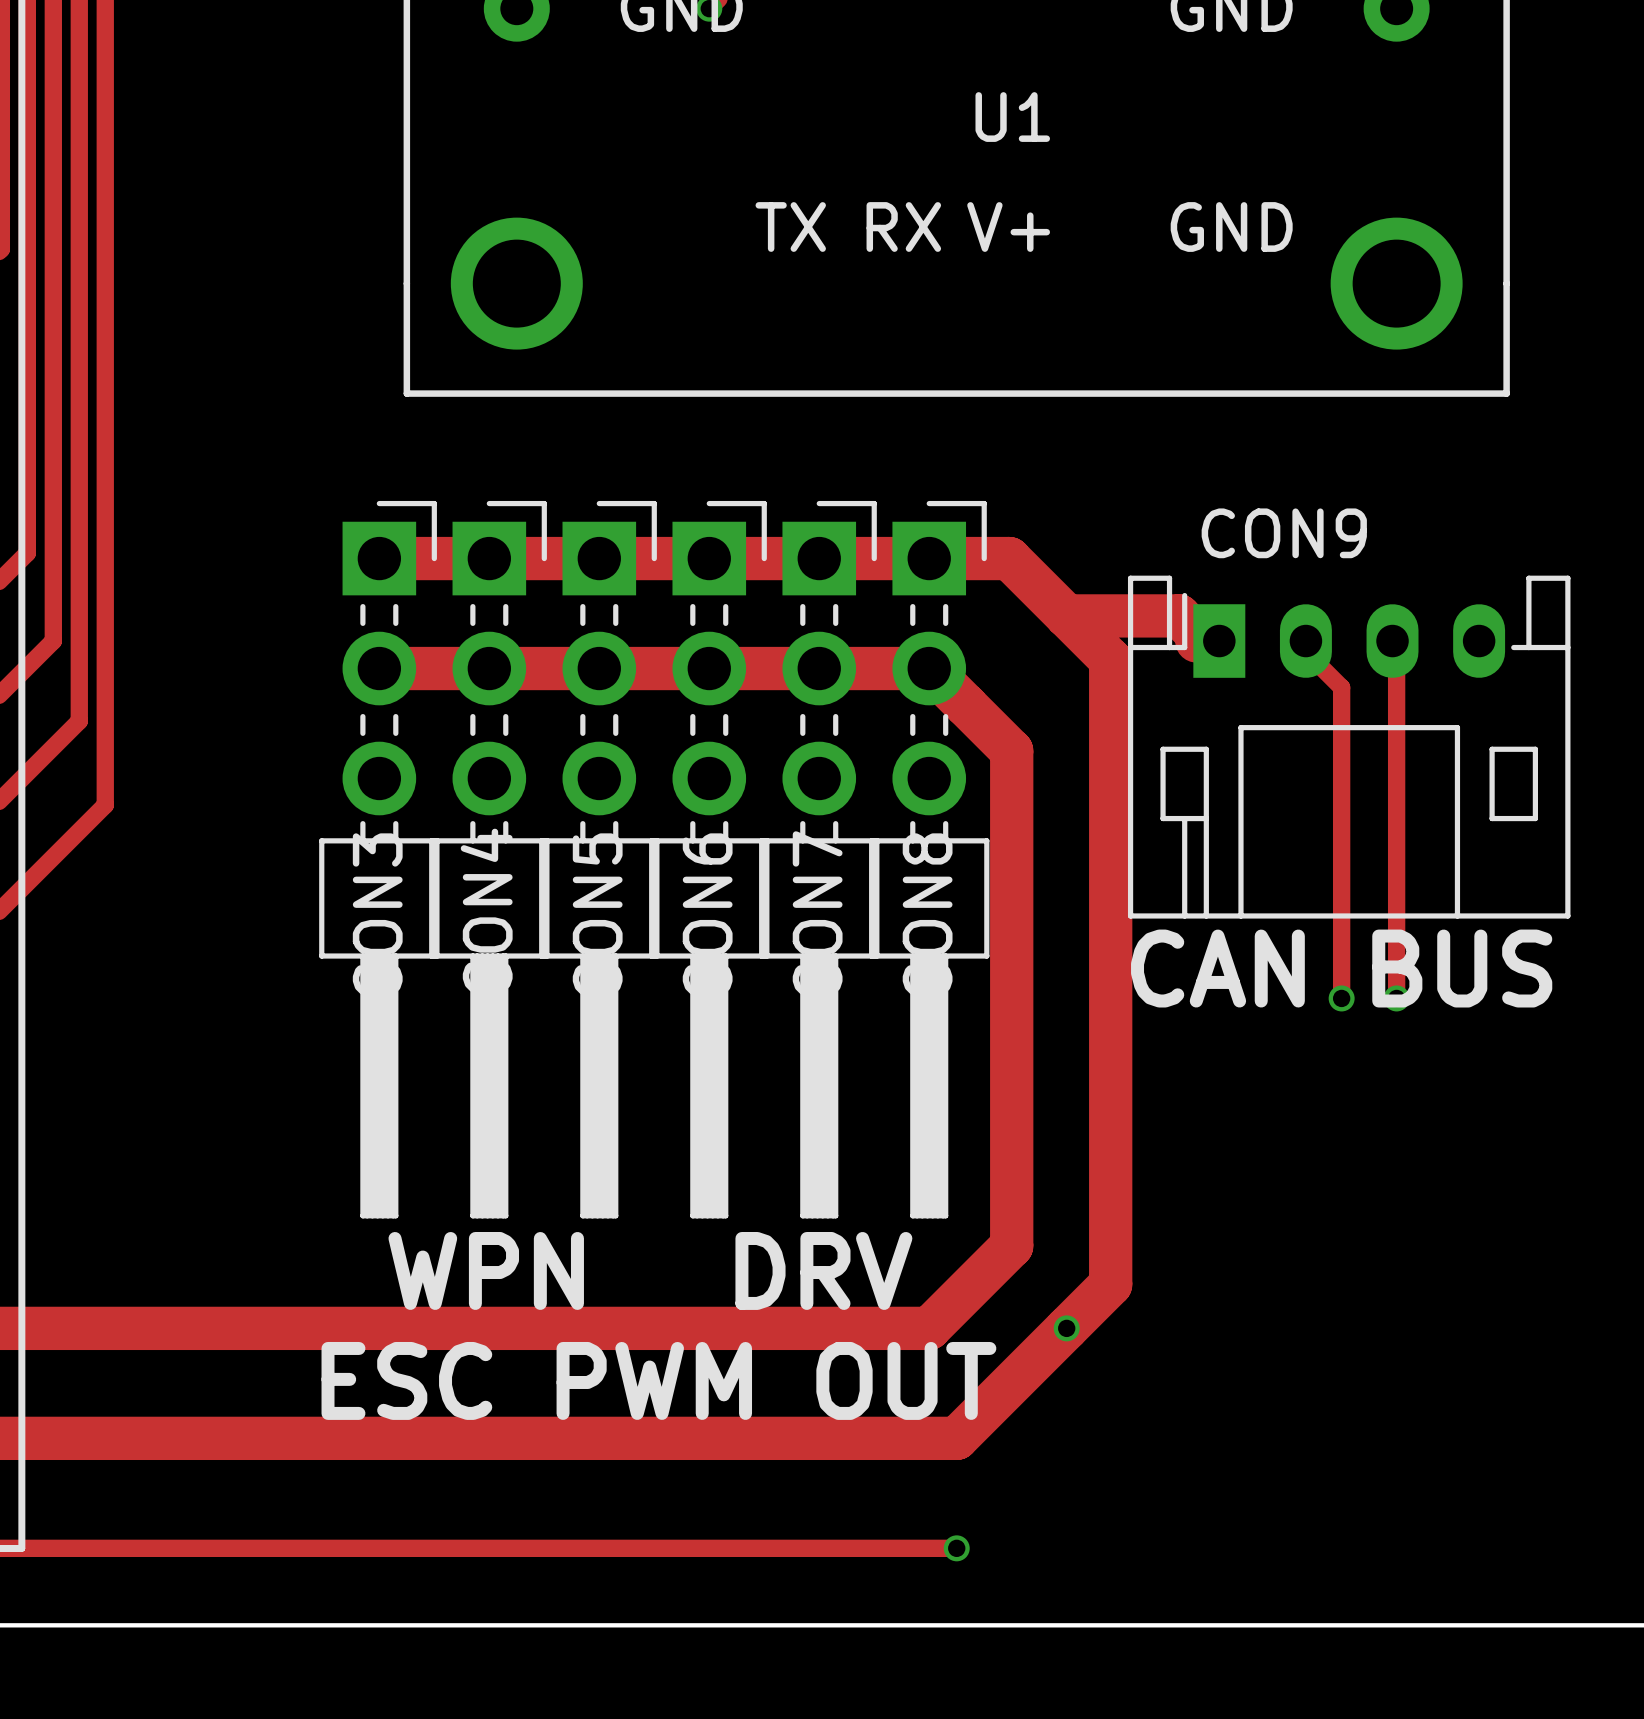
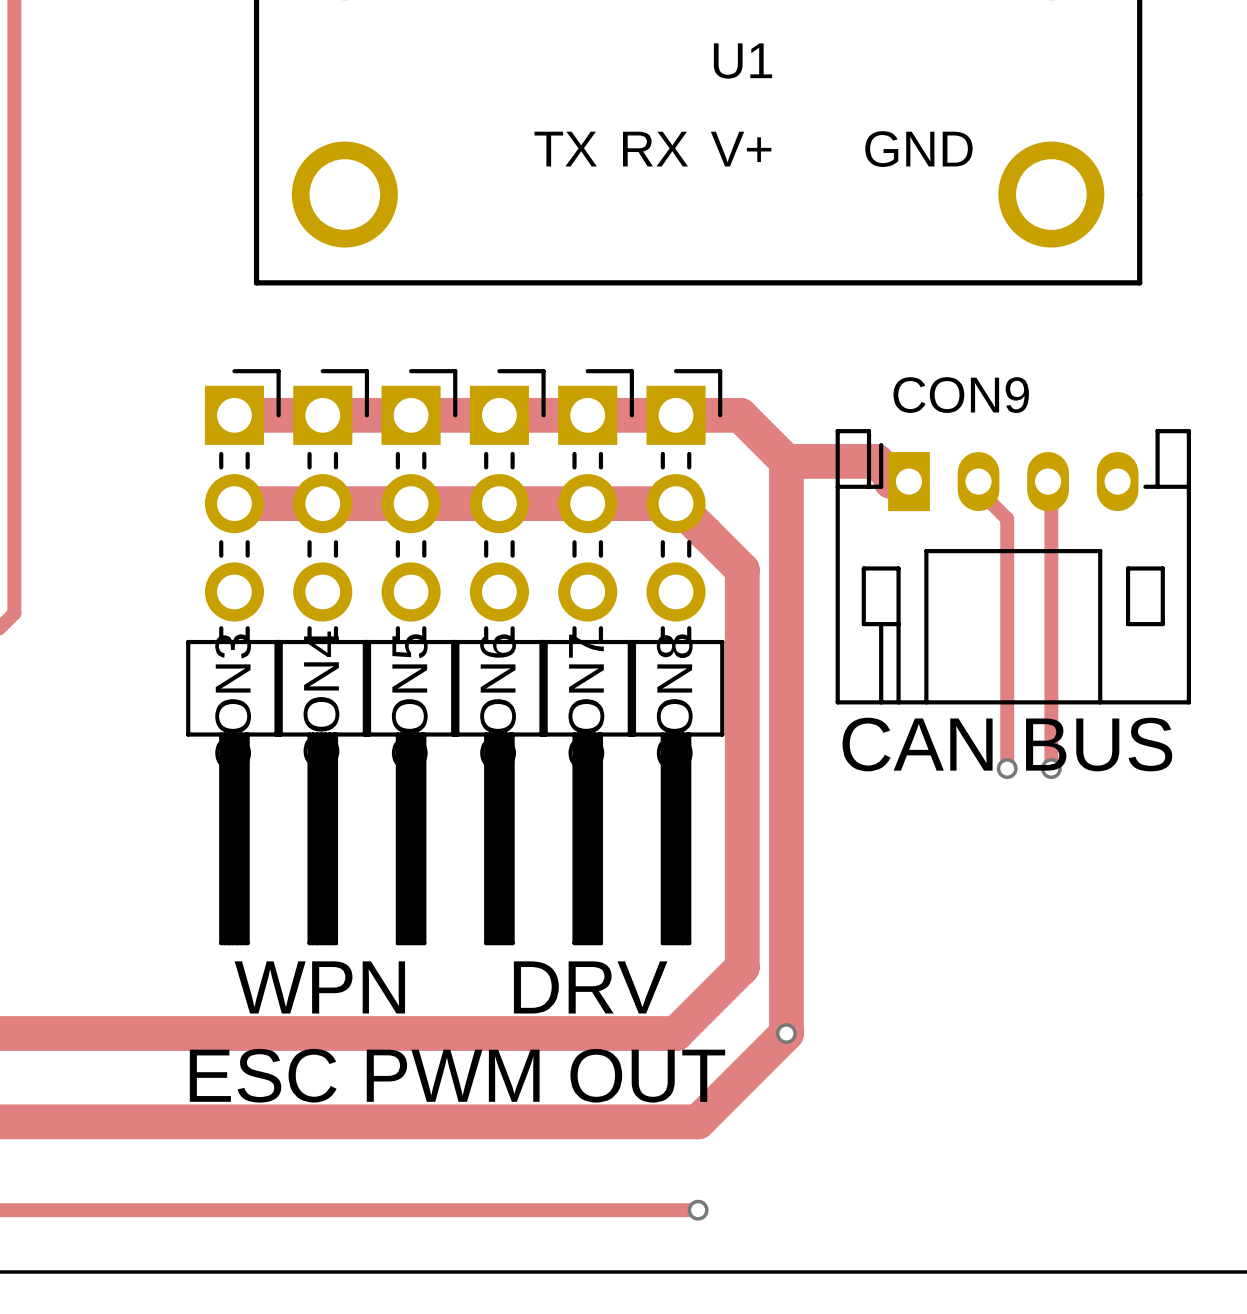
track: (1066, 615) (1110, 659) (1110, 1284) (1066, 1328) -> (786, 461) (786, 1033)

